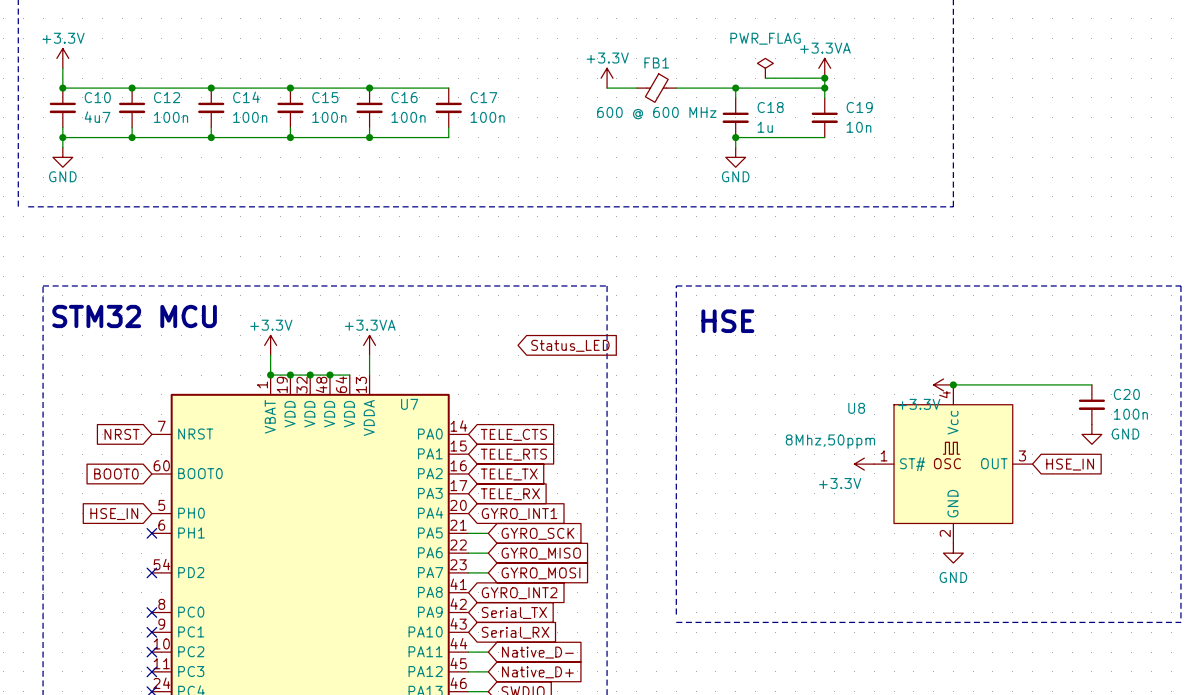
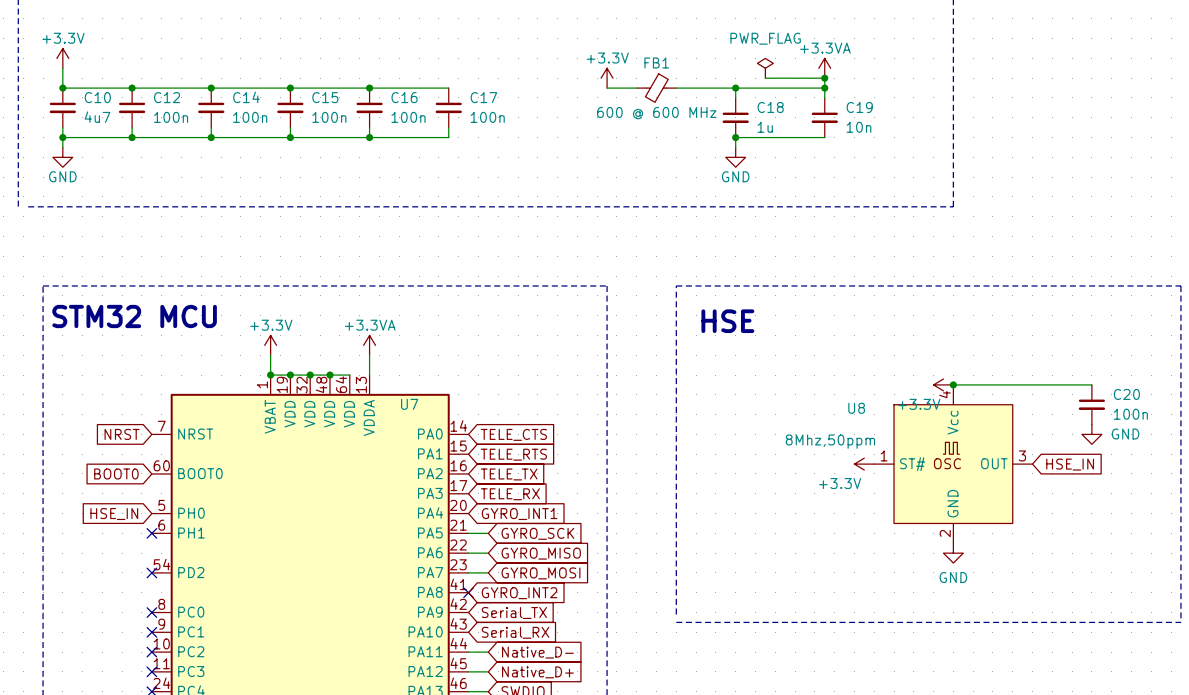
global label: Status_LED (570, 345) -> none
no-connect mark: none -> (468, 592)

